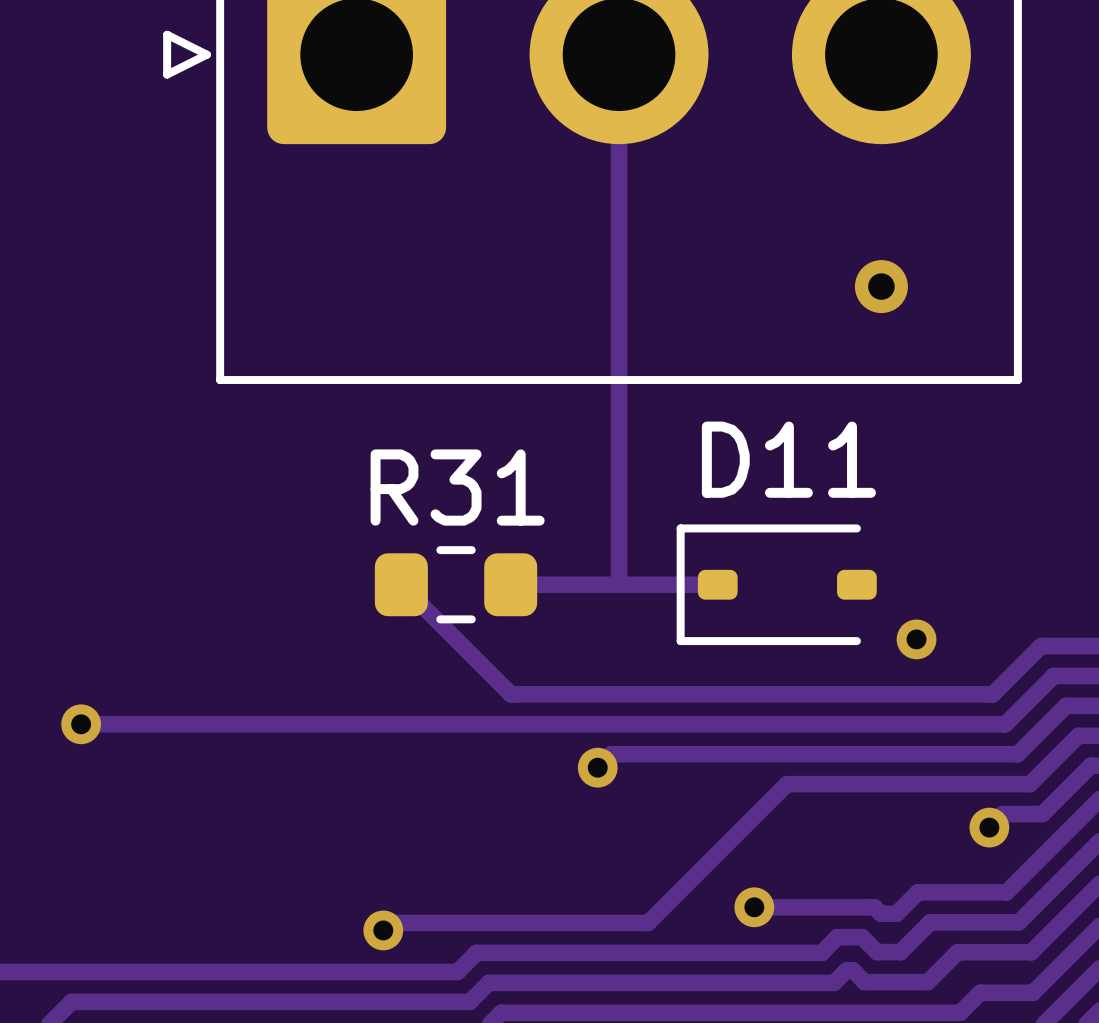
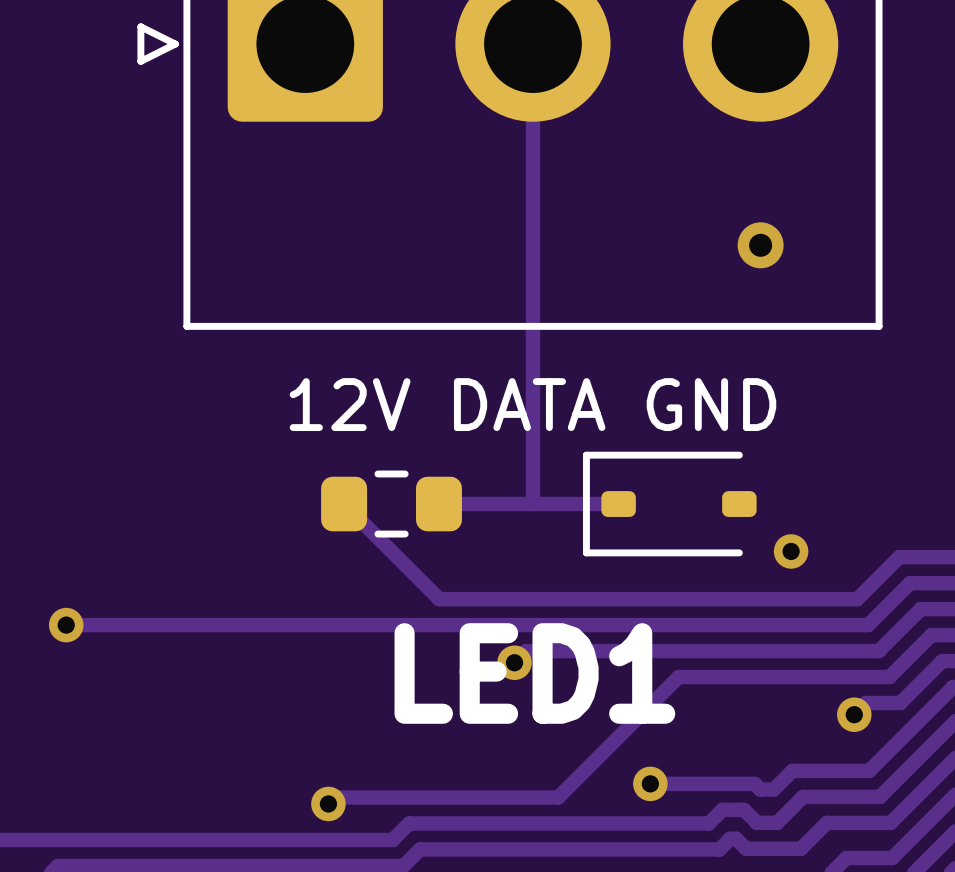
D11 name: D11 (788, 459) -> none
text: none -> 12V DATA GND (532, 404)
R31 name: R31 (457, 487) -> none
text: none -> LED1 (534, 673)

